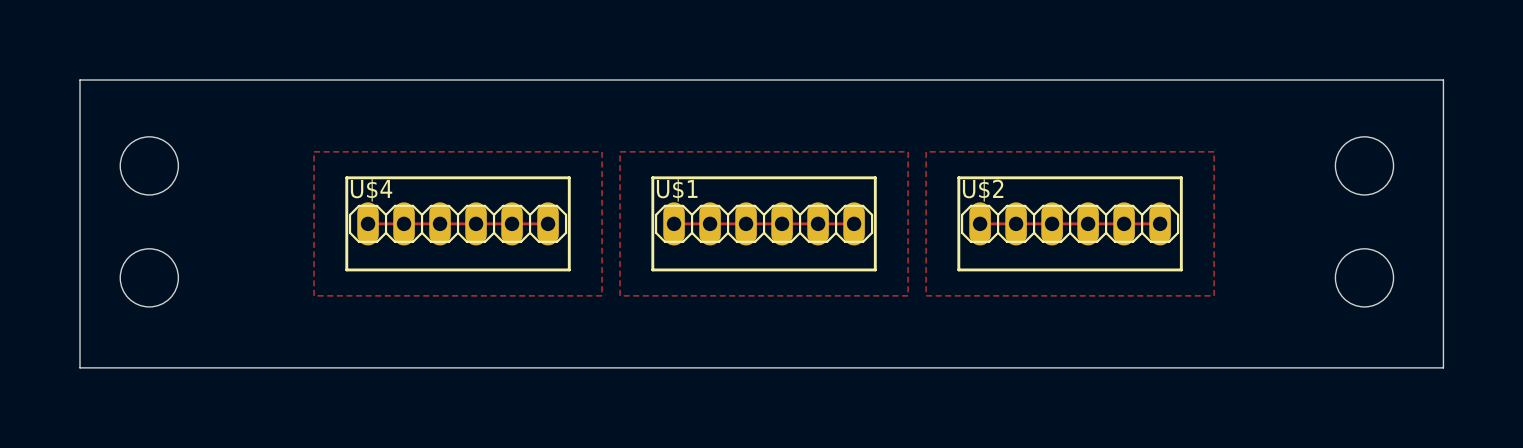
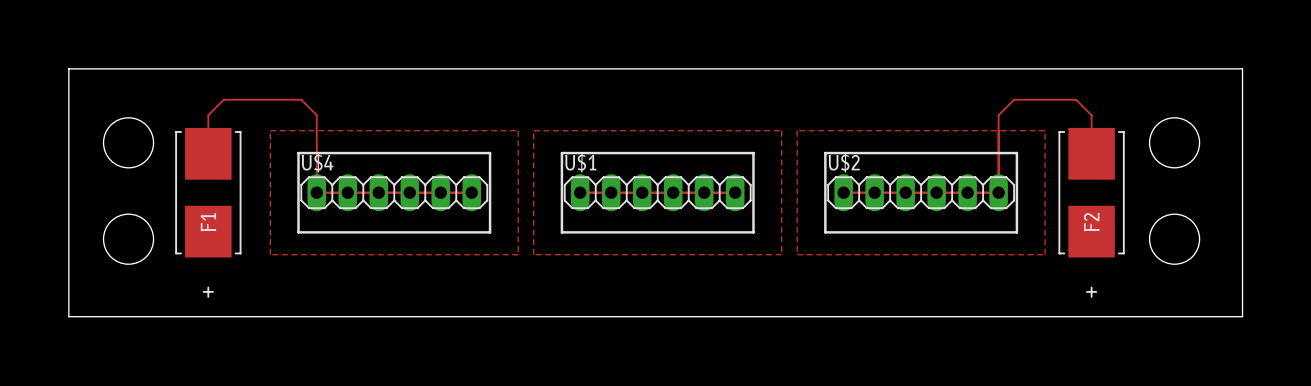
top track: none -> (208, 146) (208, 115) (223, 99) (301, 99) (316, 115) (316, 192)
top track: none -> (1091, 146) (1091, 115) (1076, 99) (1014, 99) (998, 115) (998, 192)
F1: none -> (208, 212)
F2: none -> (1091, 212)

